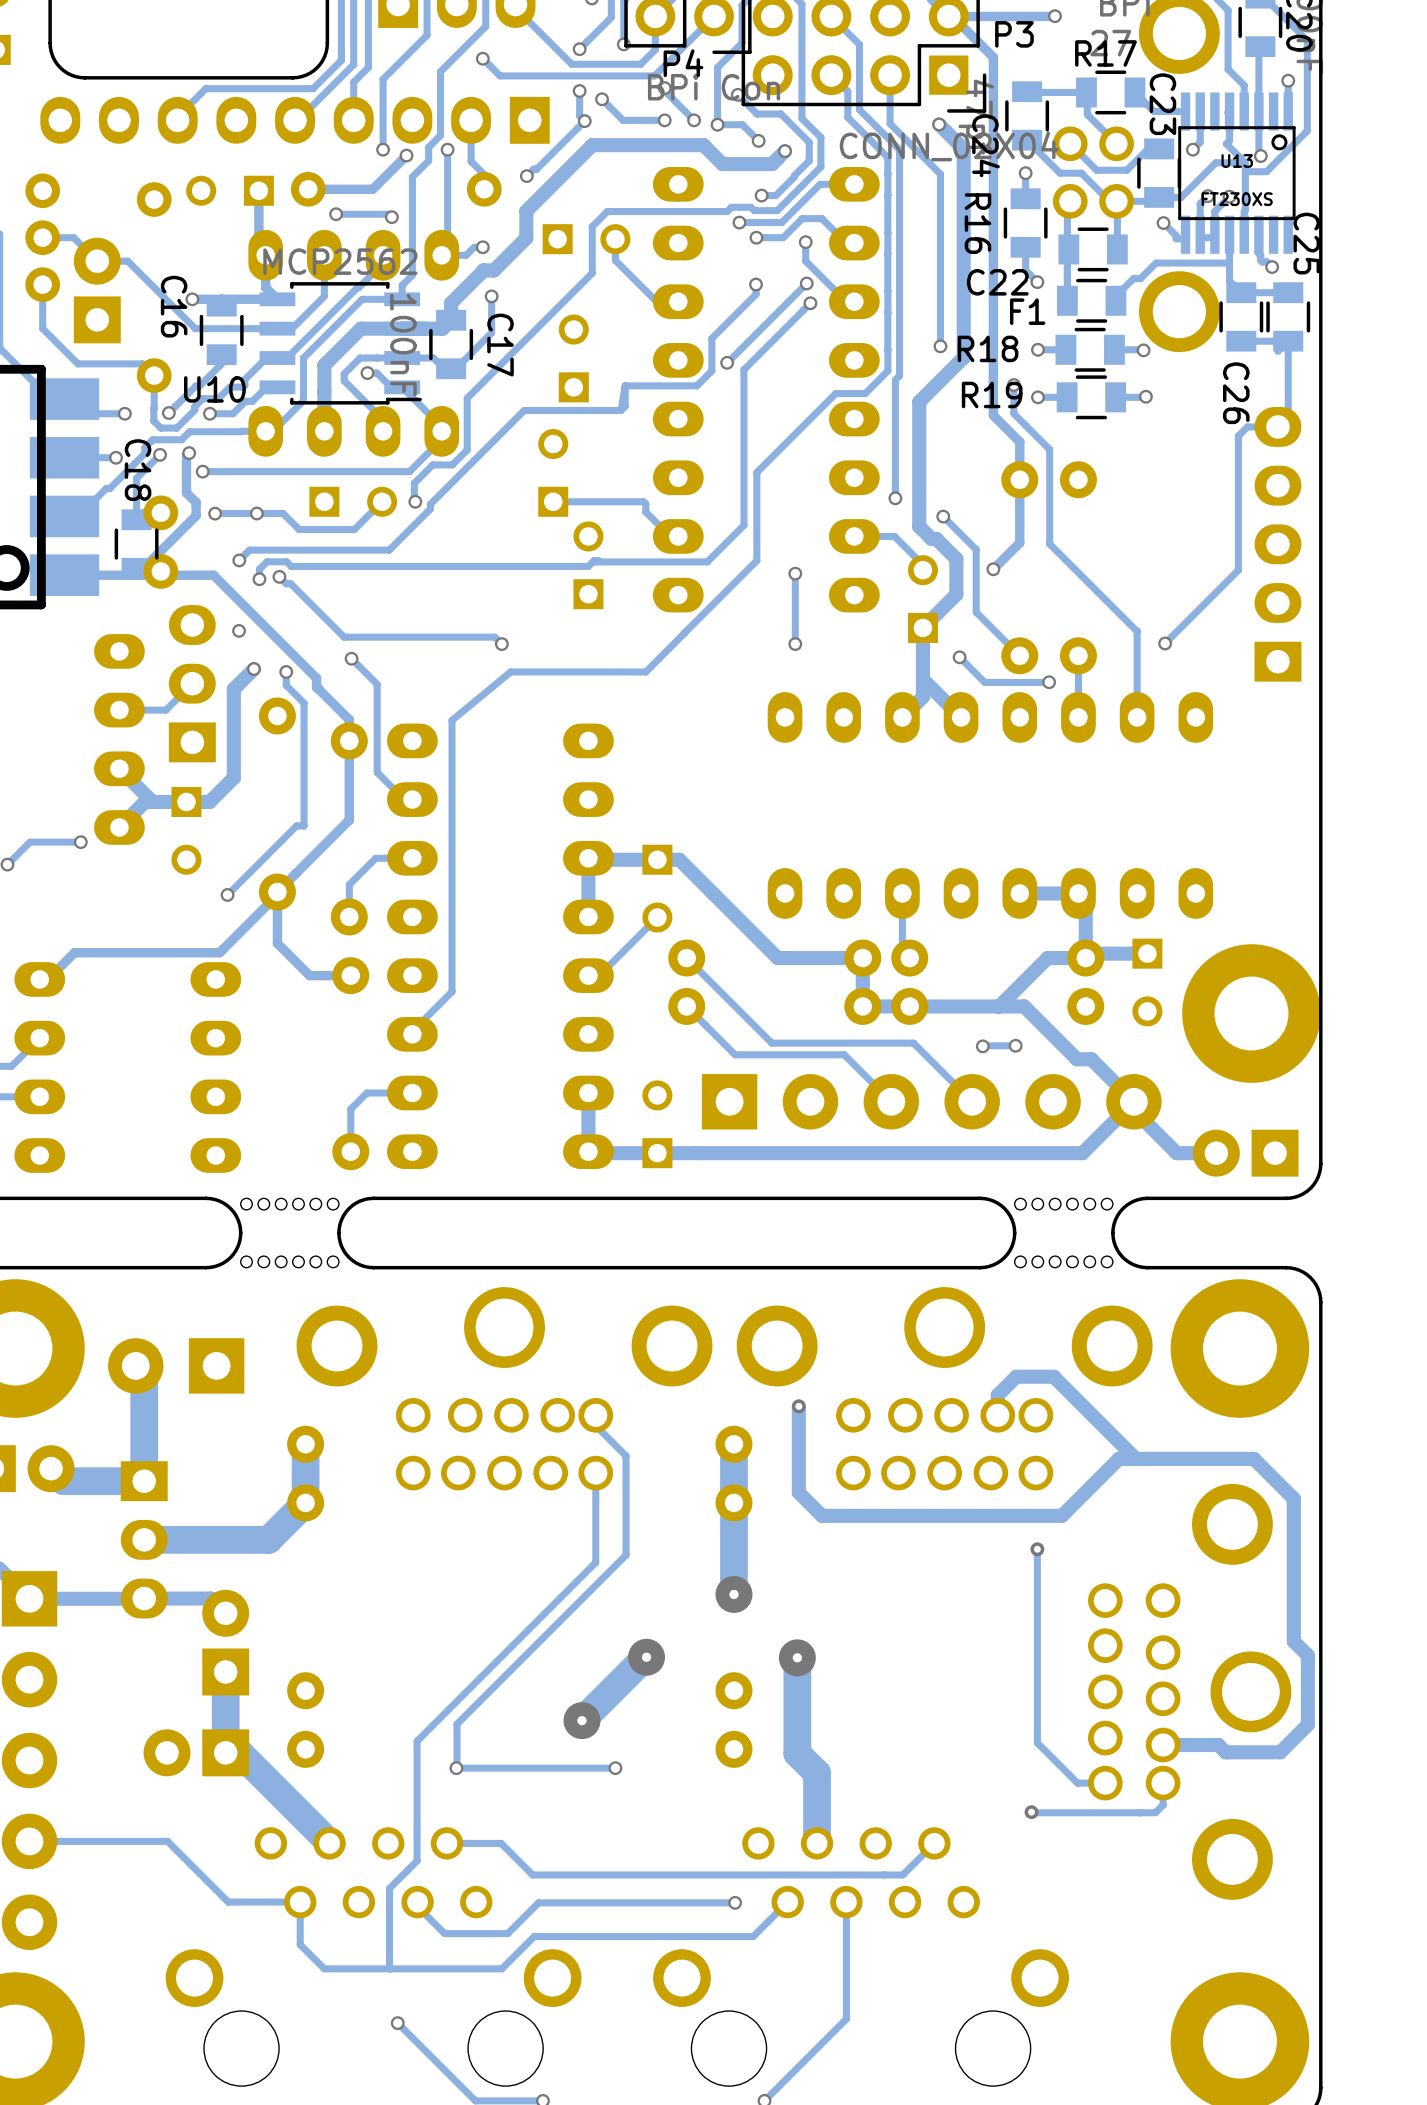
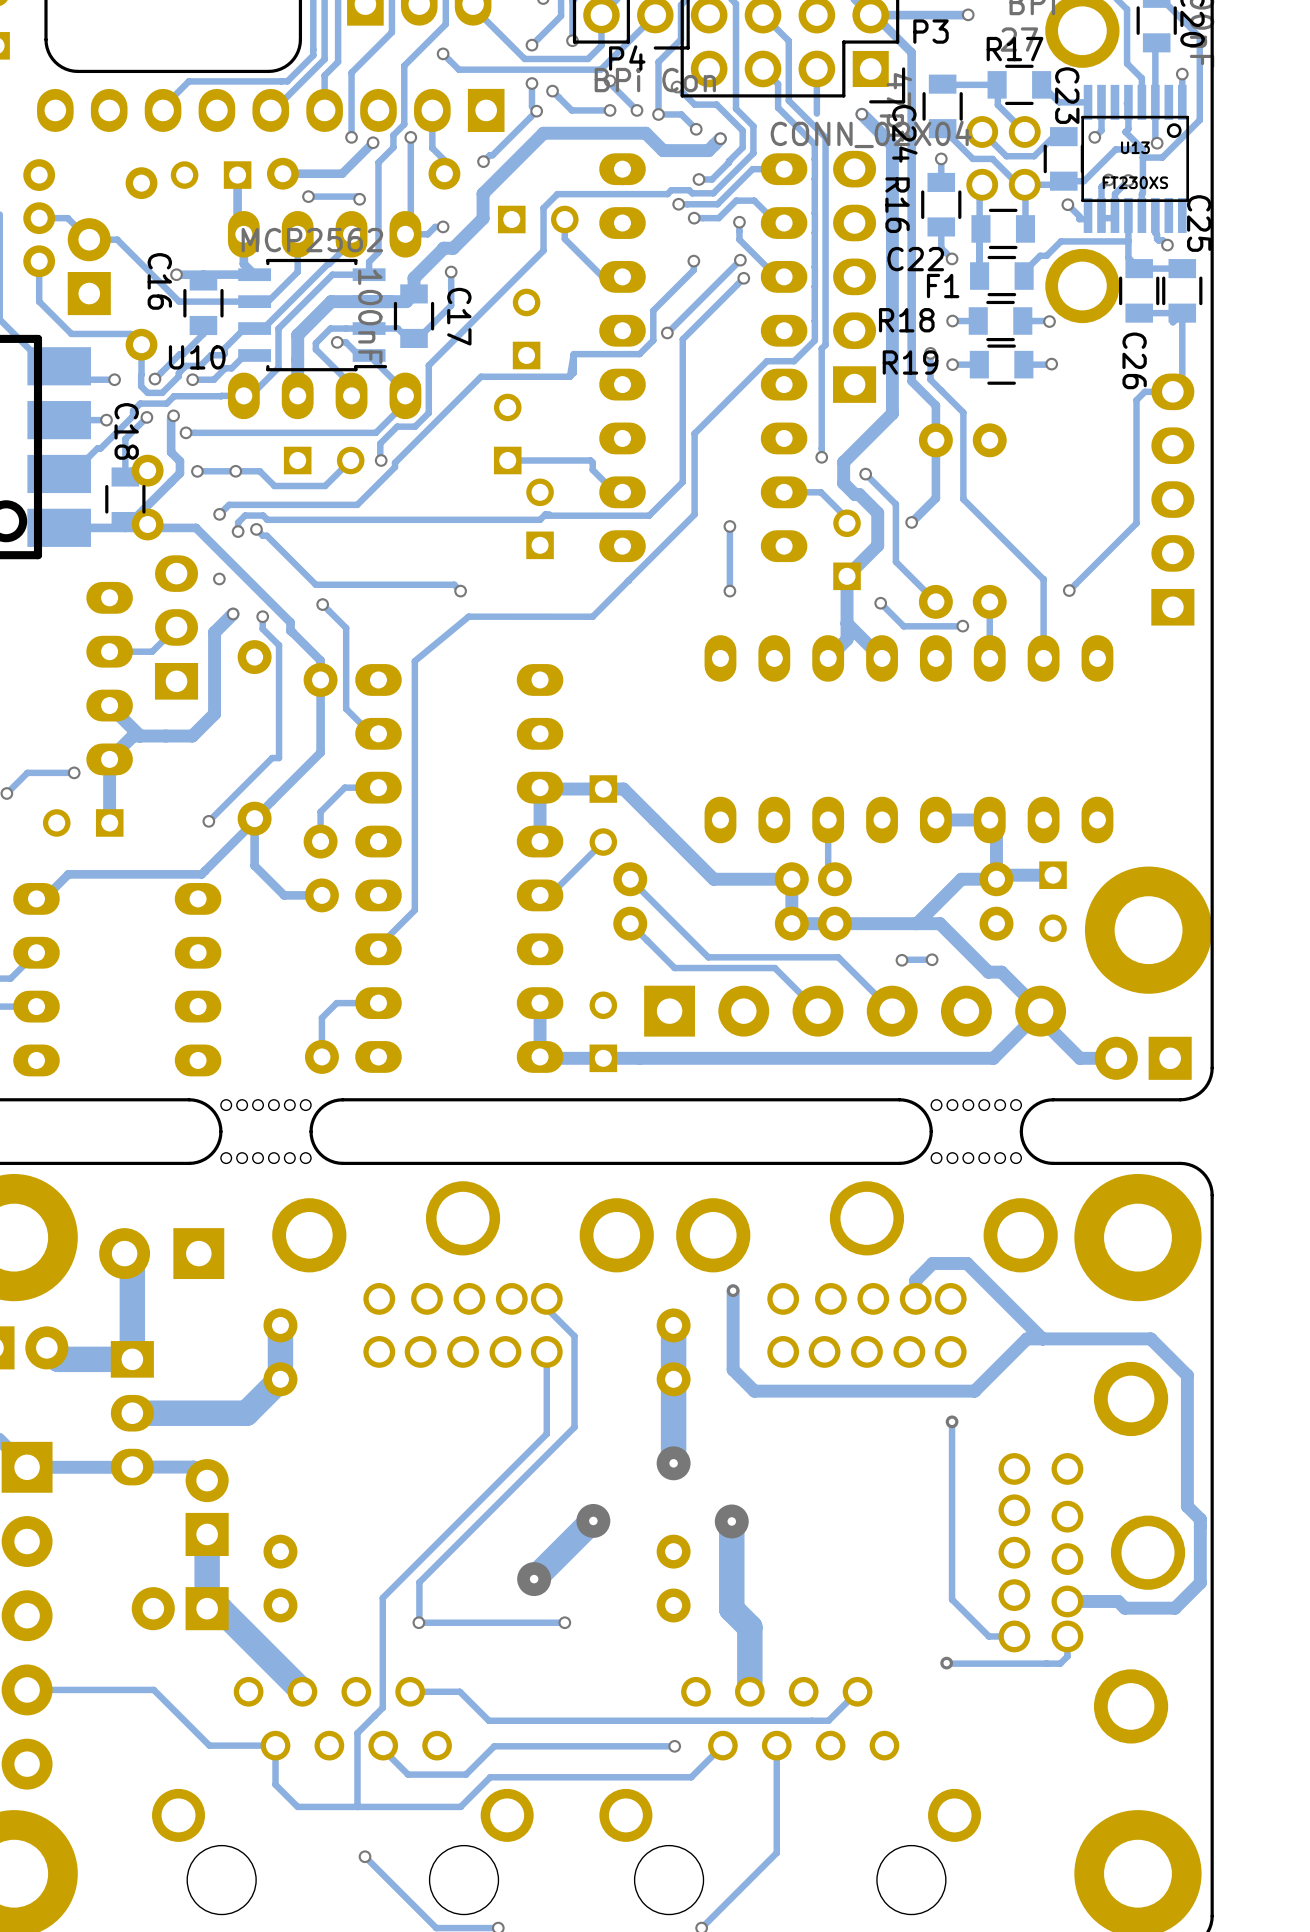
track: (890, 123) (940, 174) (940, 346) -> none
track: (963, 149) (963, 357) (919, 401) (919, 503) -> (884, 137) (892, 145) (892, 413) (843, 462)
part: none -> (854, 276)
via: (940, 346) -> none
track: none -> (109, 759) (109, 822)
part rotation: 0° (186, 830) -> 90° clockwise (83, 822)
part position: (186, 830) -> (83, 822)

